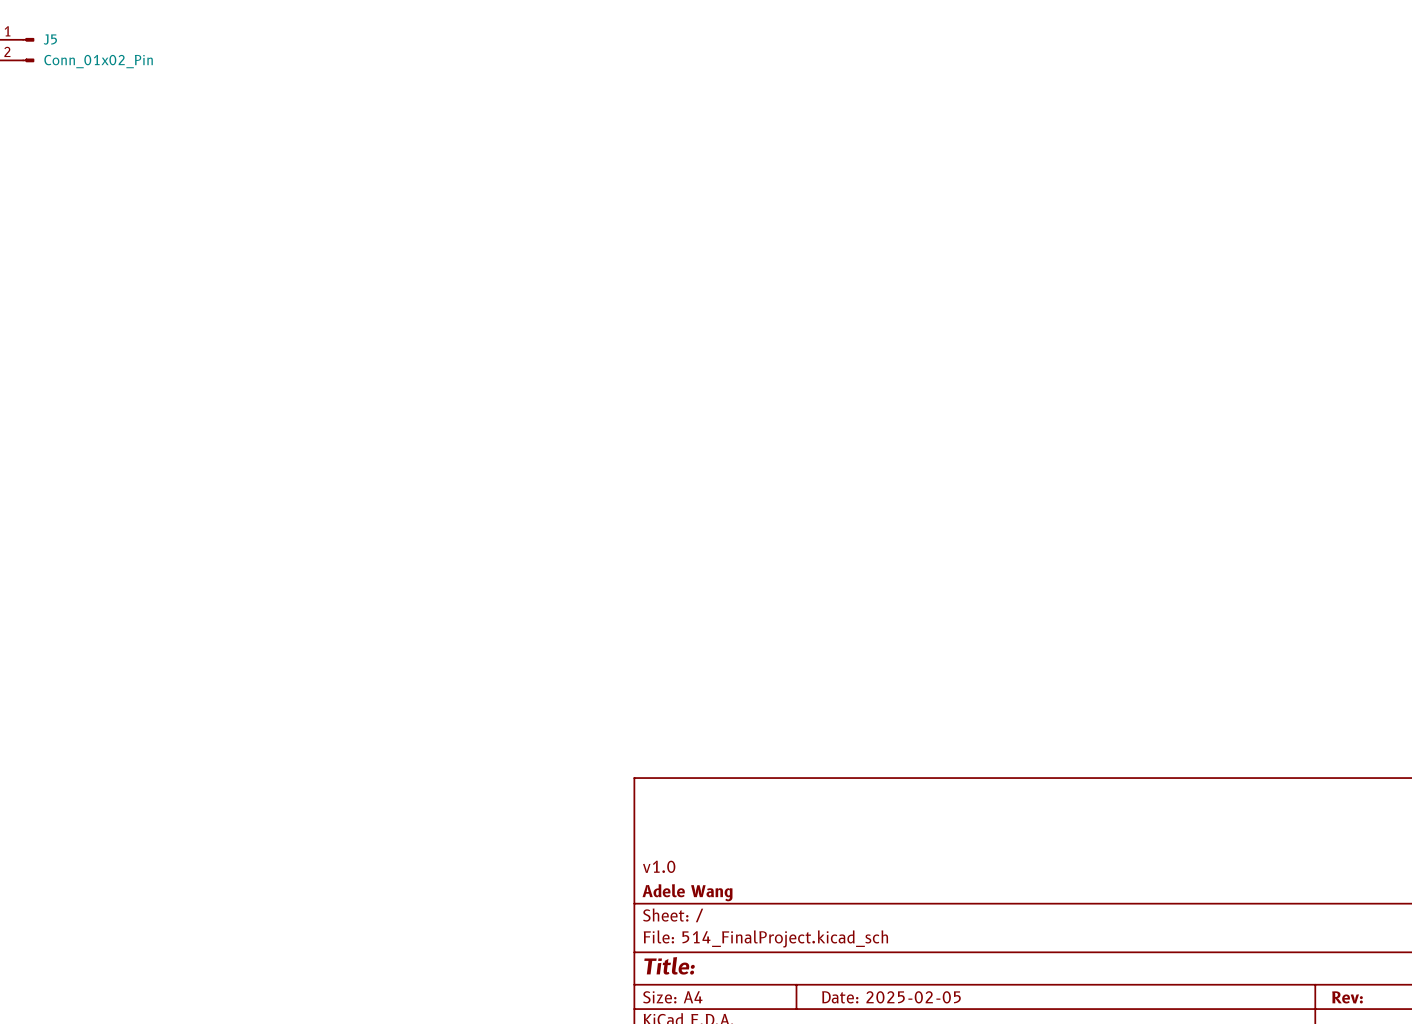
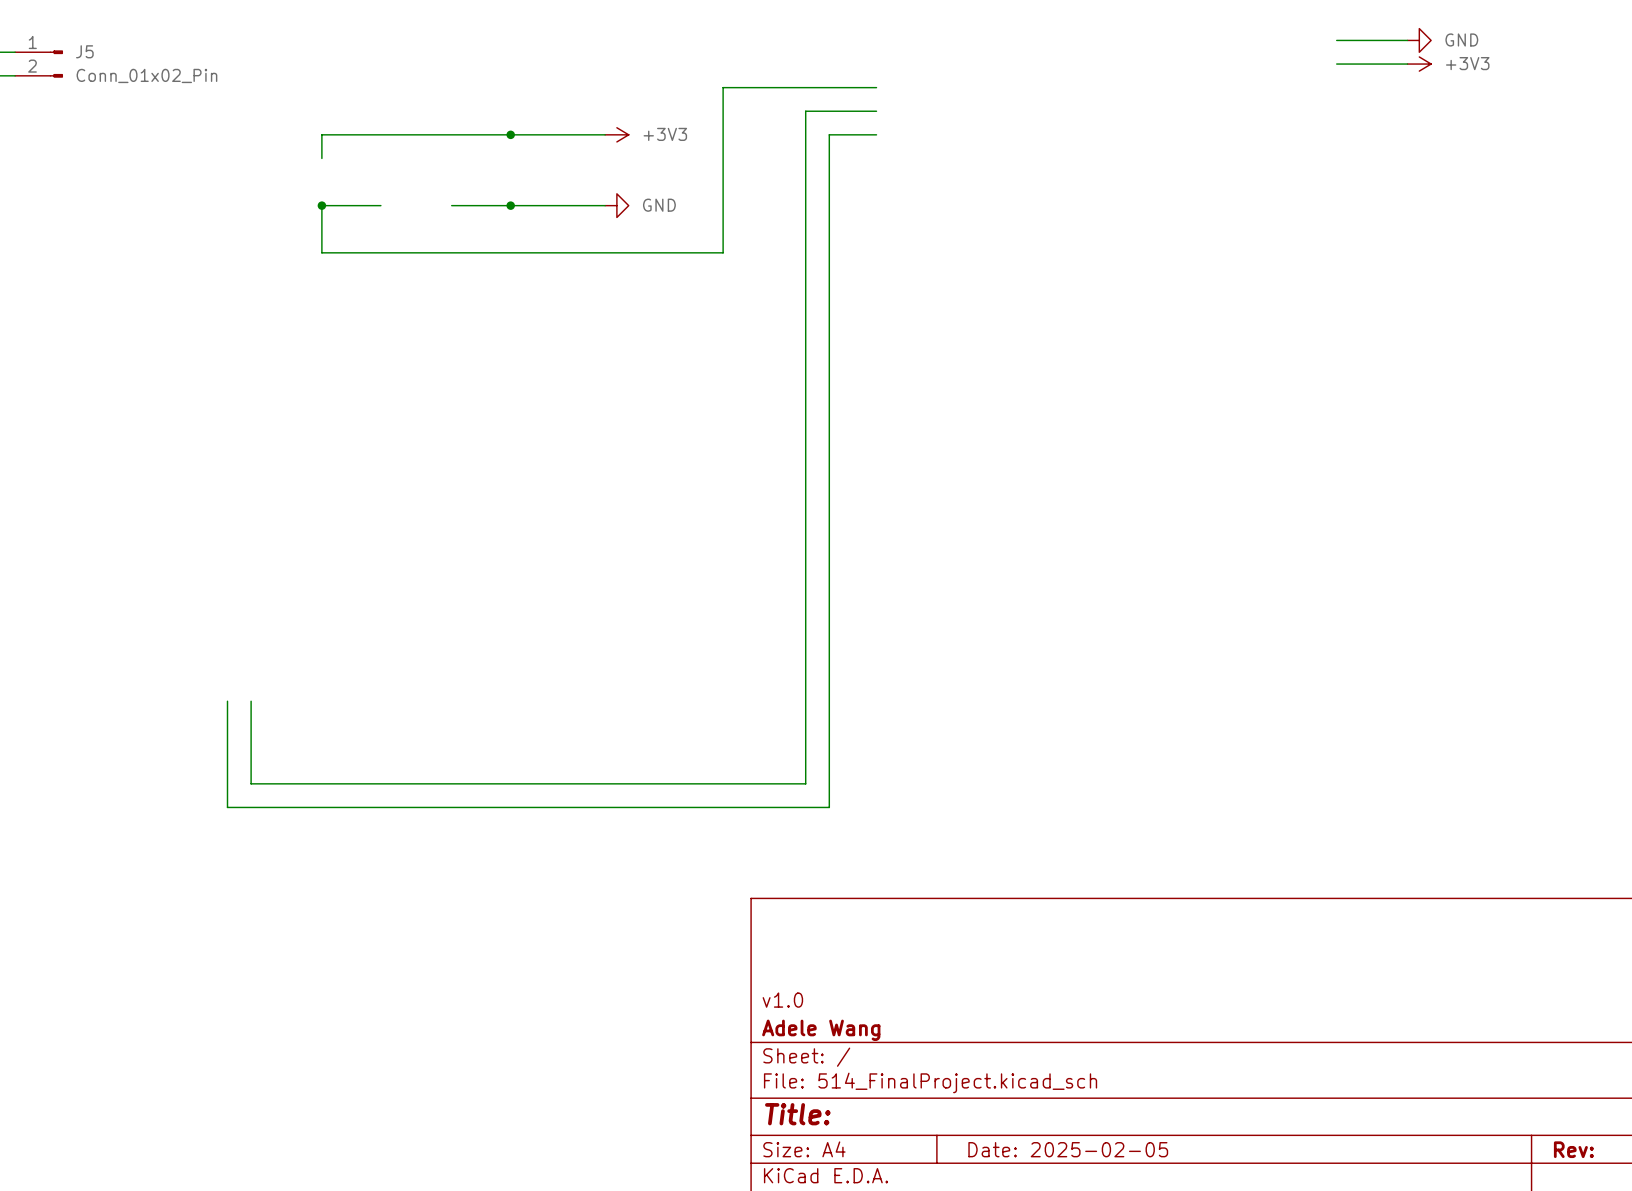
wire: none -> (1336, 40) (1407, 40)
power symbol: none -> GND (1419, 40)
wire: none -> (1336, 64) (1407, 64)
power symbol: none -> +3V3 (1419, 64)
wire: none -> (876, 87) (723, 87) (723, 252) (321, 252) (321, 205) (380, 205)
wire: none -> (876, 111) (805, 111) (805, 783) (251, 783) (251, 701)
junction: none -> (510, 134)
wire: none -> (605, 134) (321, 134) (321, 158)
power symbol: none -> +3V3 (616, 134)
wire: none -> (876, 134) (829, 134) (829, 807) (227, 807) (227, 701)
junction: none -> (321, 205)
wire: none -> (451, 205) (605, 205)
junction: none -> (510, 205)
power symbol: none -> GND (616, 205)

